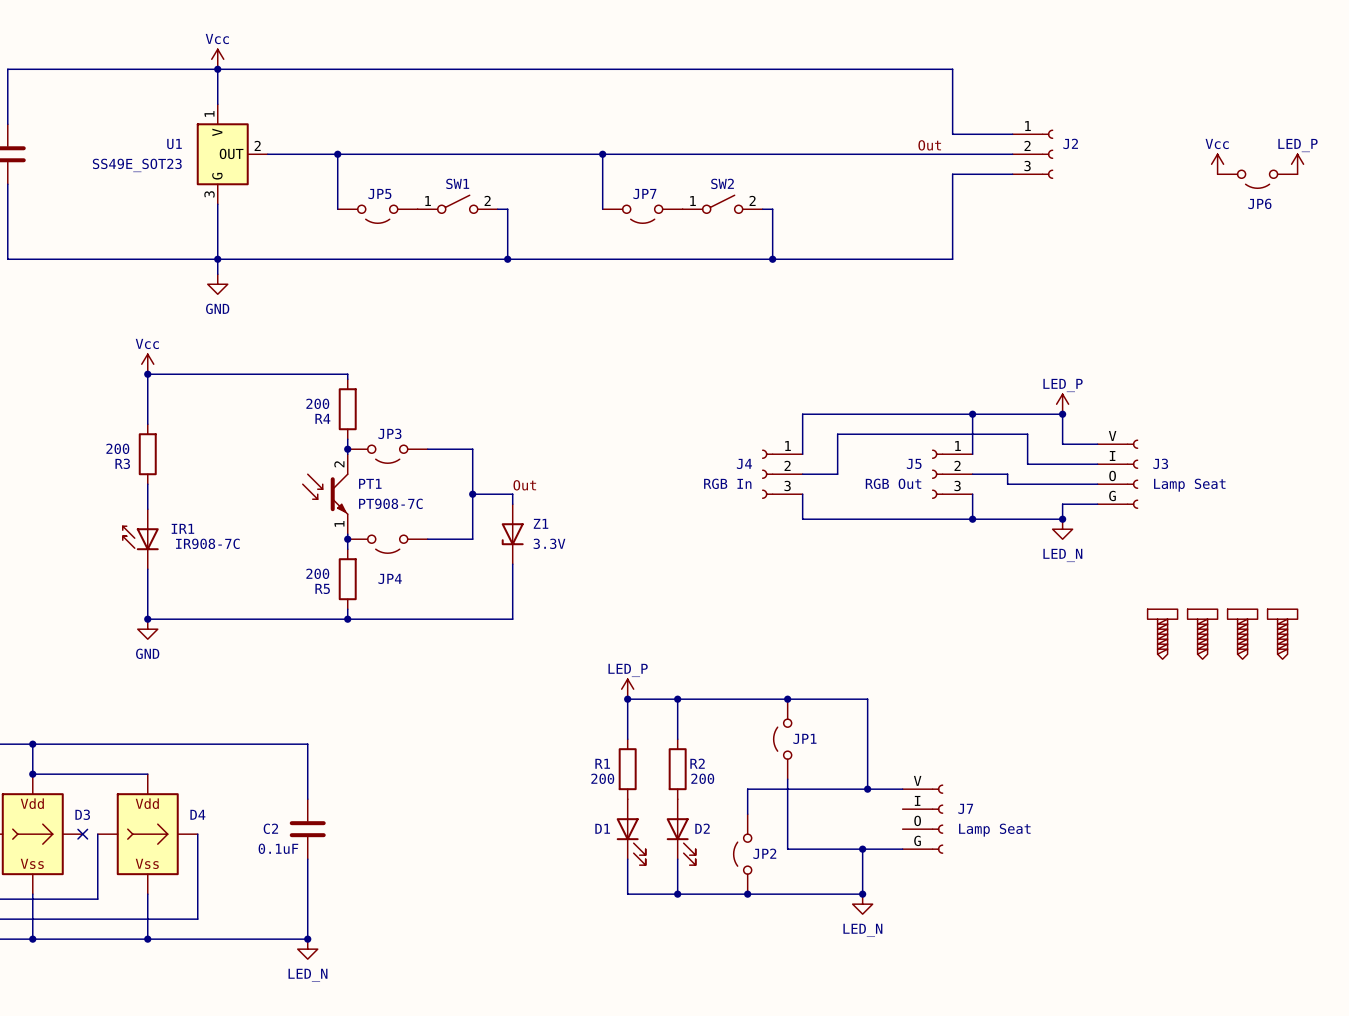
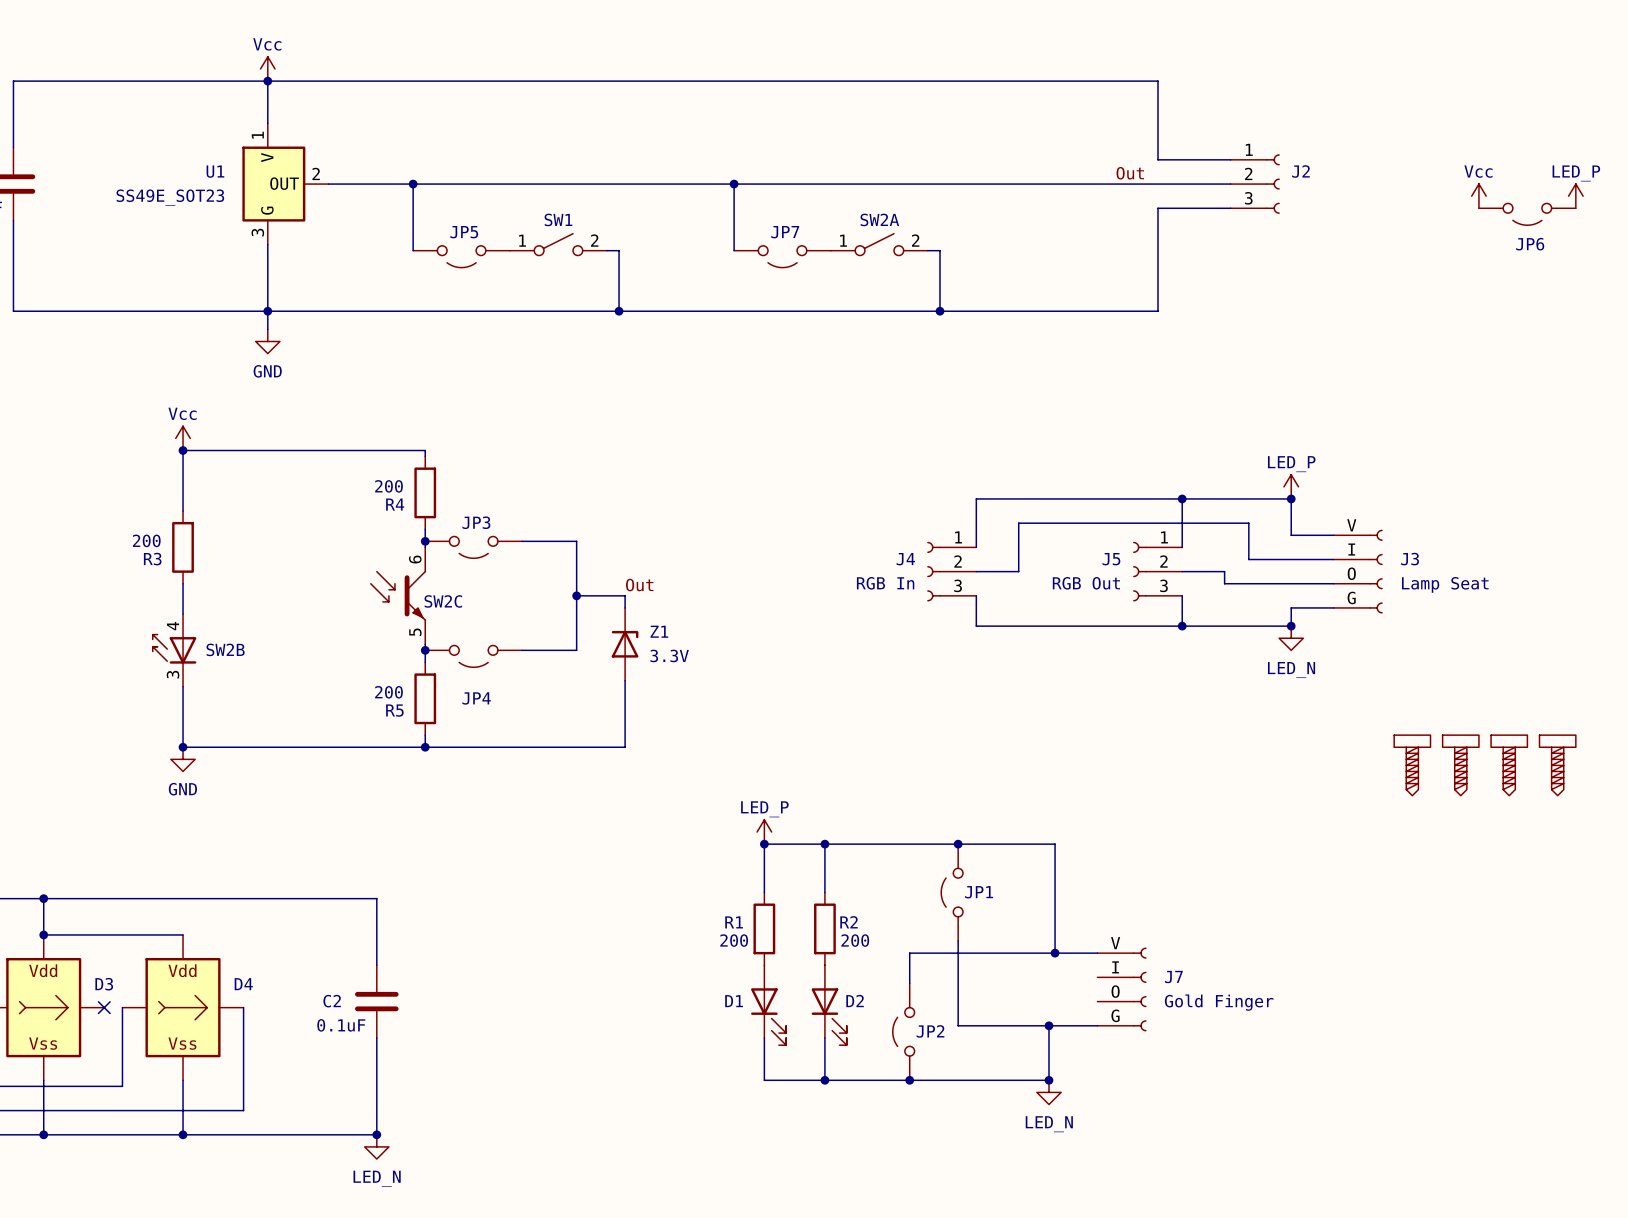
SW2 name: SW2 (722, 183) -> SW2A (879, 219)
PT1 pin number: 2 (339, 464) -> 6 (415, 559)
PT1 name: PT1 (370, 483) -> SW2C (443, 601)
PT1 value: PT908-7C (390, 503) -> none
IR1 pin number: none -> 4 (173, 626)
PT1 pin number: 1 (339, 523) -> 5 (415, 632)
IR1 name: IR1 (182, 528) -> SW2B (225, 649)
Z1 rotation: 0° (512, 534) -> 180° (625, 644)
IR1 value: IR908-7C (207, 543) -> none
IR1 pin number: none -> 3 (173, 674)
J7 value: Lamp Seat (994, 830) -> Gold Finger (1219, 1002)

